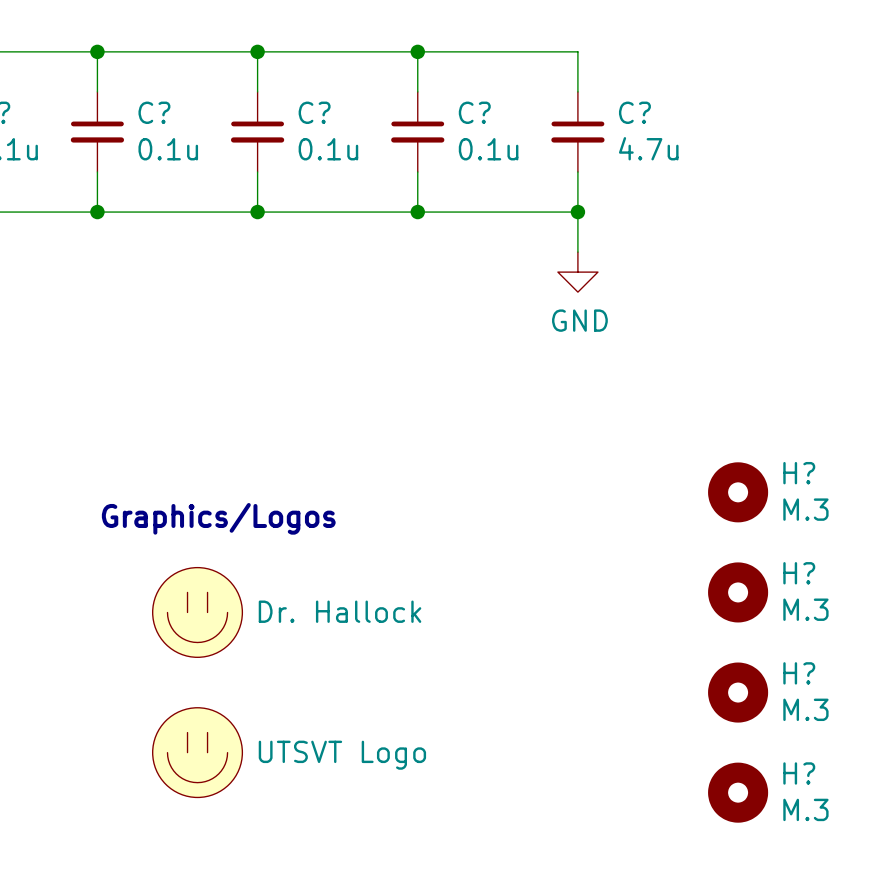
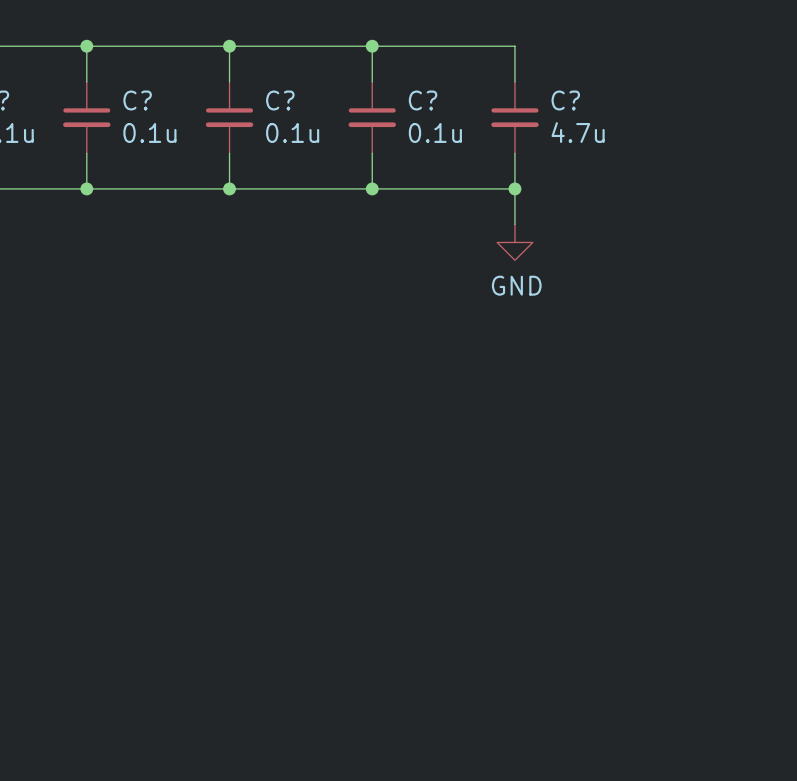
H?: M.3 (738, 492) -> none
text: Graphics/Logos (218, 518) -> none
H?: M.3 (738, 592) -> none
part: Dr. Hallock (197, 612) -> none
H?: M.3 (738, 692) -> none
part: UTSVT Logo (197, 752) -> none
H?: M.3 (738, 792) -> none

